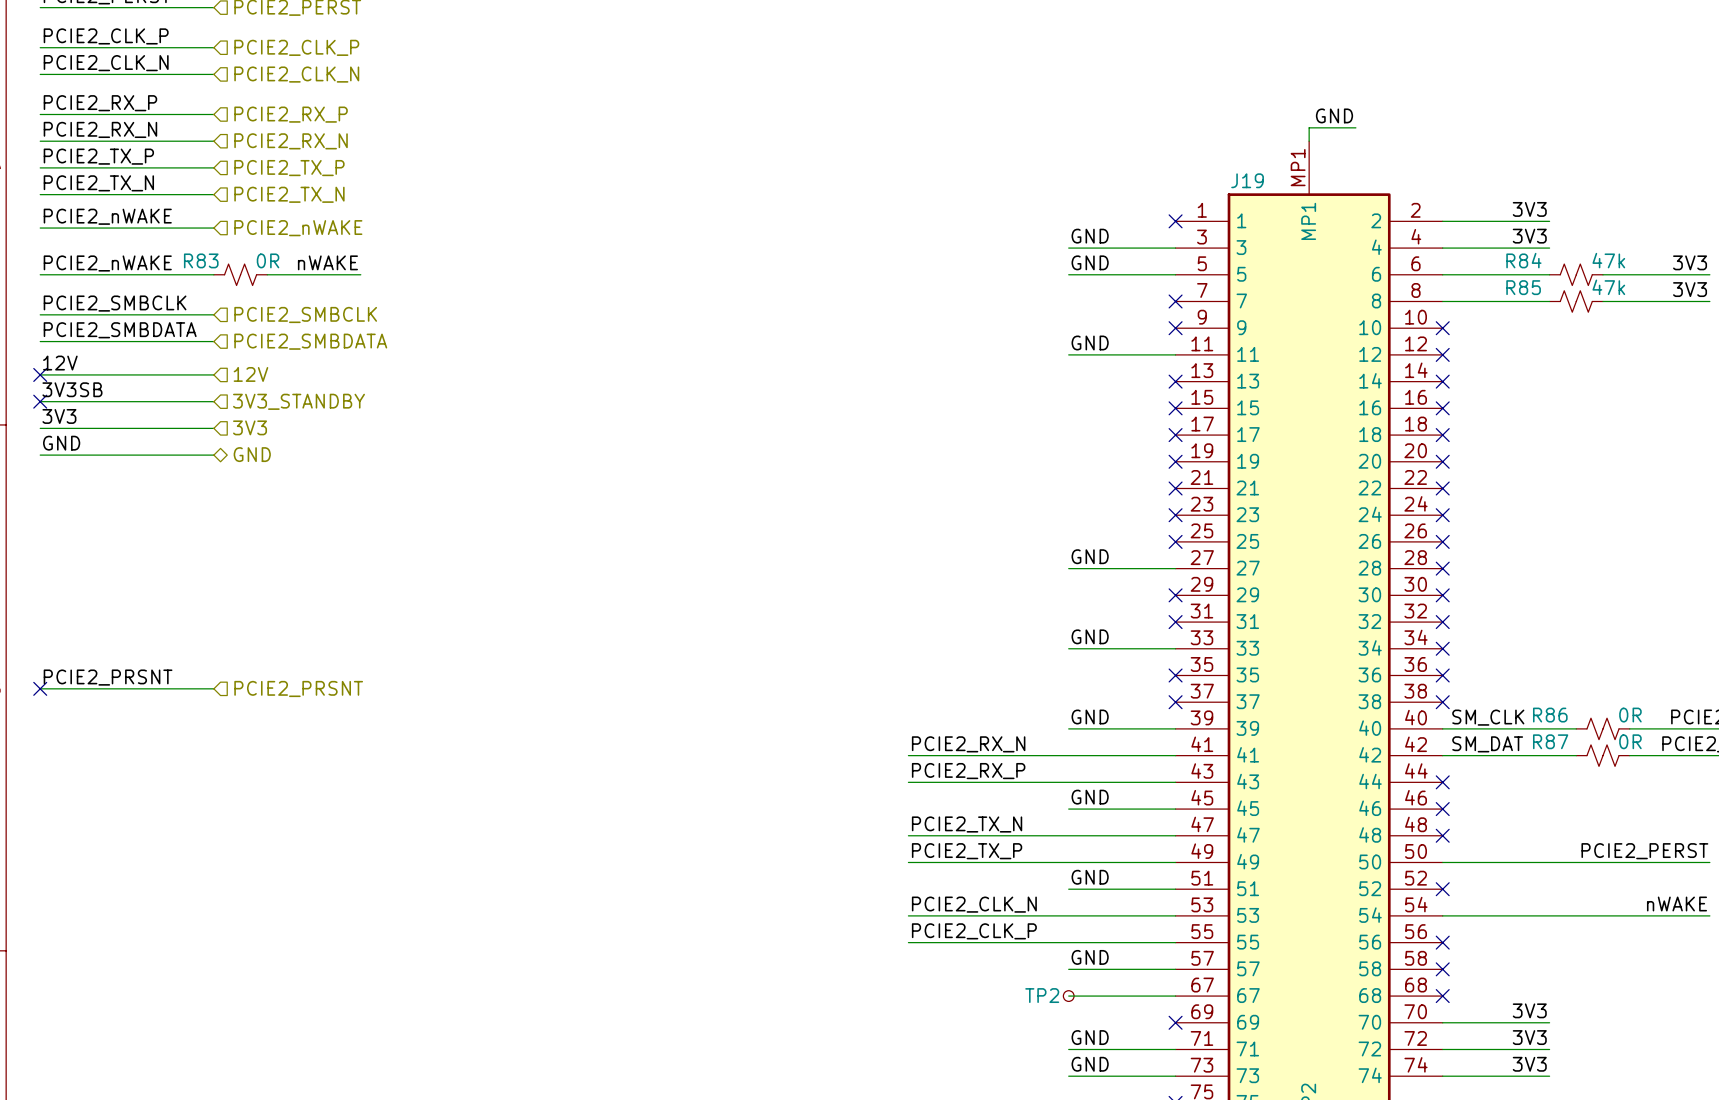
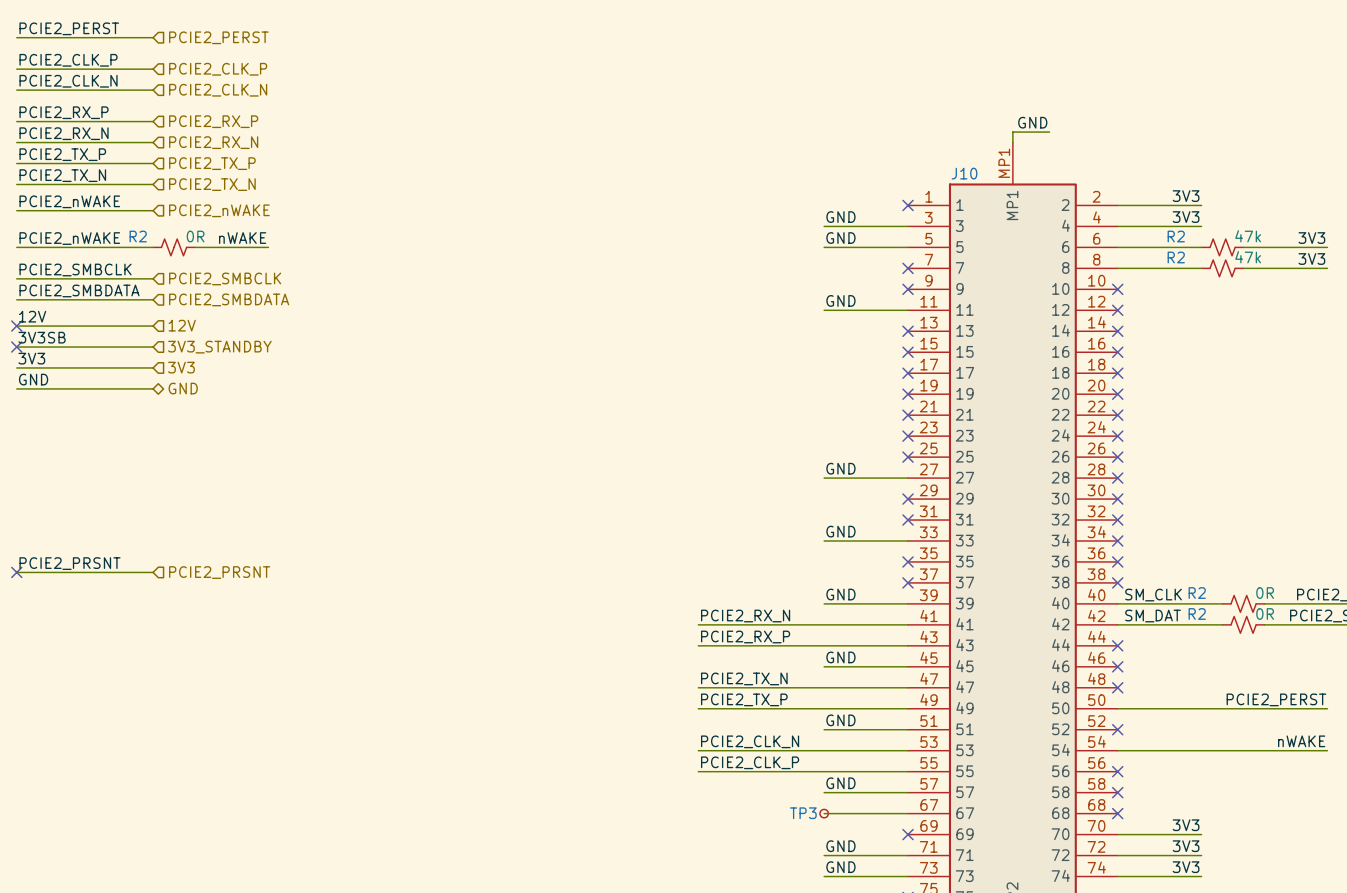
J19 name: J19 (1247, 180) -> J10 (964, 173)
R83 name: R83 (201, 260) -> R2 (138, 236)
R84 name: R84 (1523, 260) -> R2 (1176, 236)
R85 name: R85 (1523, 287) -> R2 (1176, 257)
R86 name: R86 (1550, 715) -> R2 (1197, 593)
R87 name: R87 (1550, 741) -> R2 (1197, 614)
TP2 name: TP2 (1042, 995) -> TP3 (803, 813)

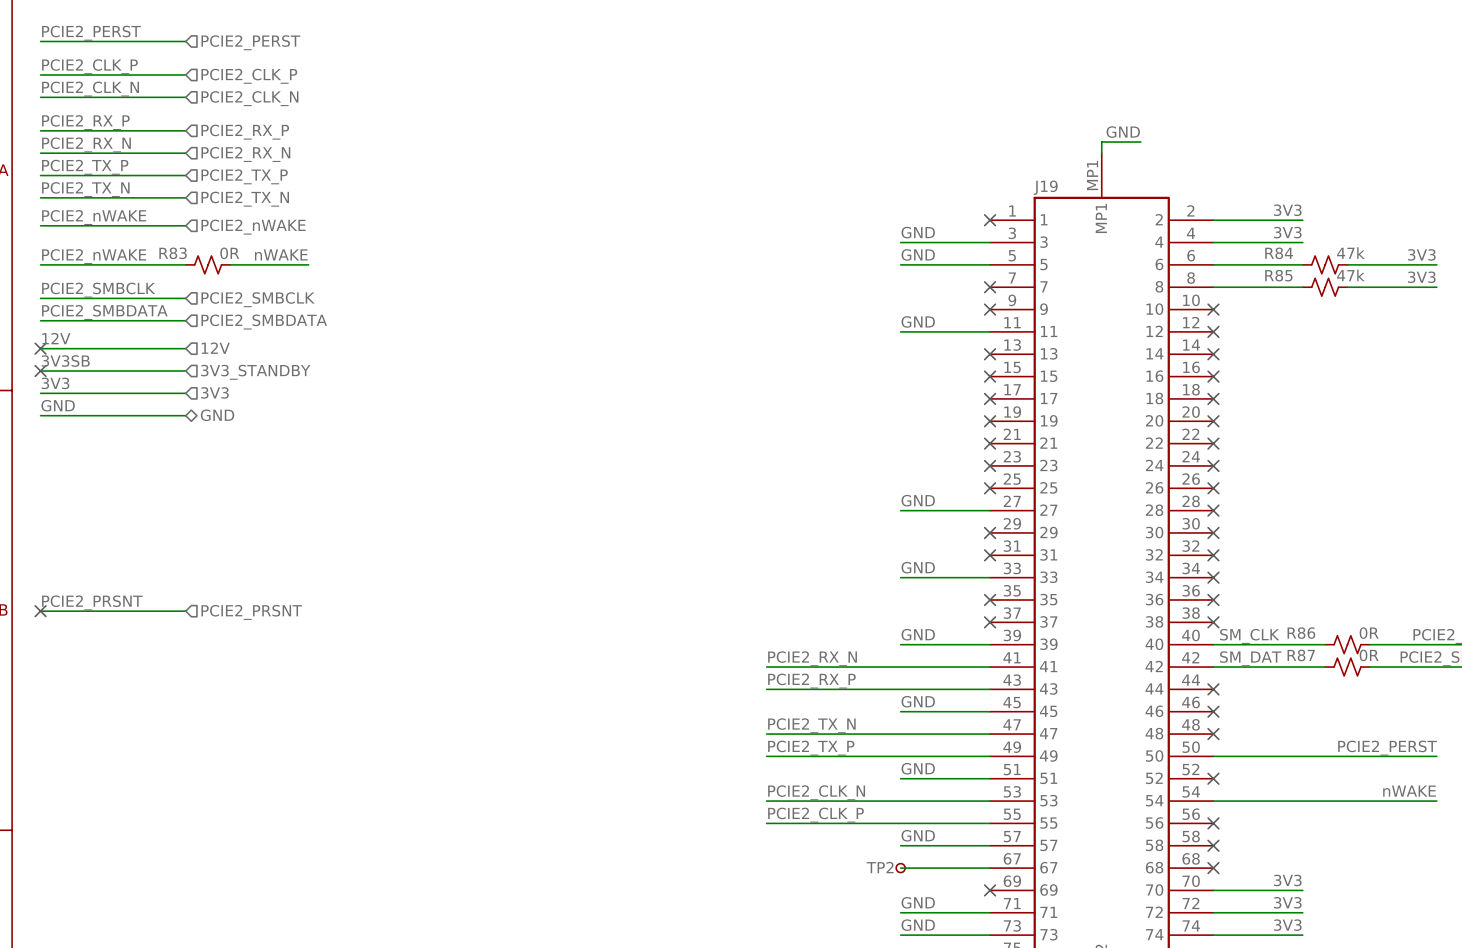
J10 name: J10 (964, 173) -> J19 (1045, 187)
R2 name: R2 (138, 236) -> R83 (173, 253)
R2 name: R2 (1176, 236) -> R84 (1279, 253)
R2 name: R2 (1176, 257) -> R85 (1278, 275)
R2 name: R2 (1197, 593) -> R86 (1301, 633)
R2 name: R2 (1197, 614) -> R87 (1301, 655)
TP3 name: TP3 (803, 813) -> TP2 (880, 867)

